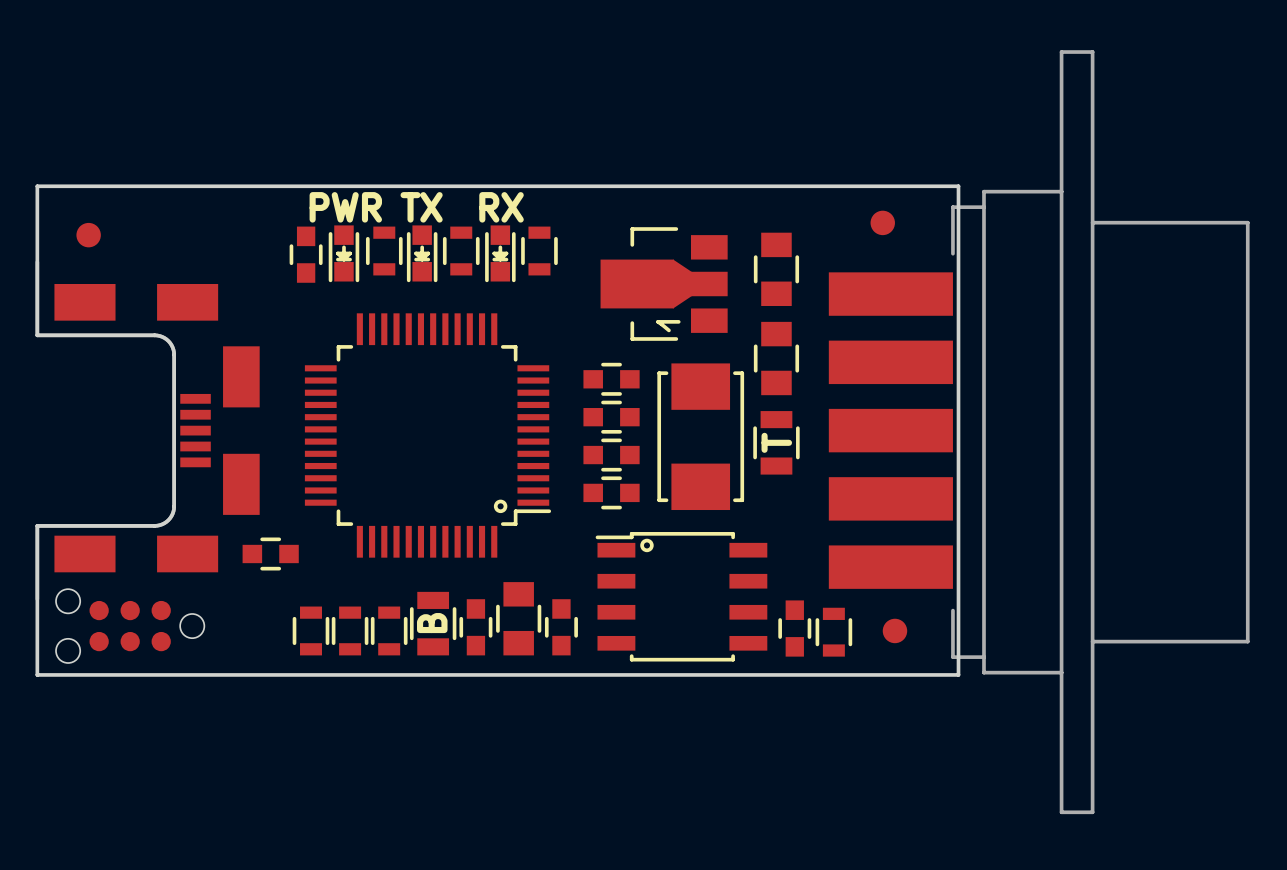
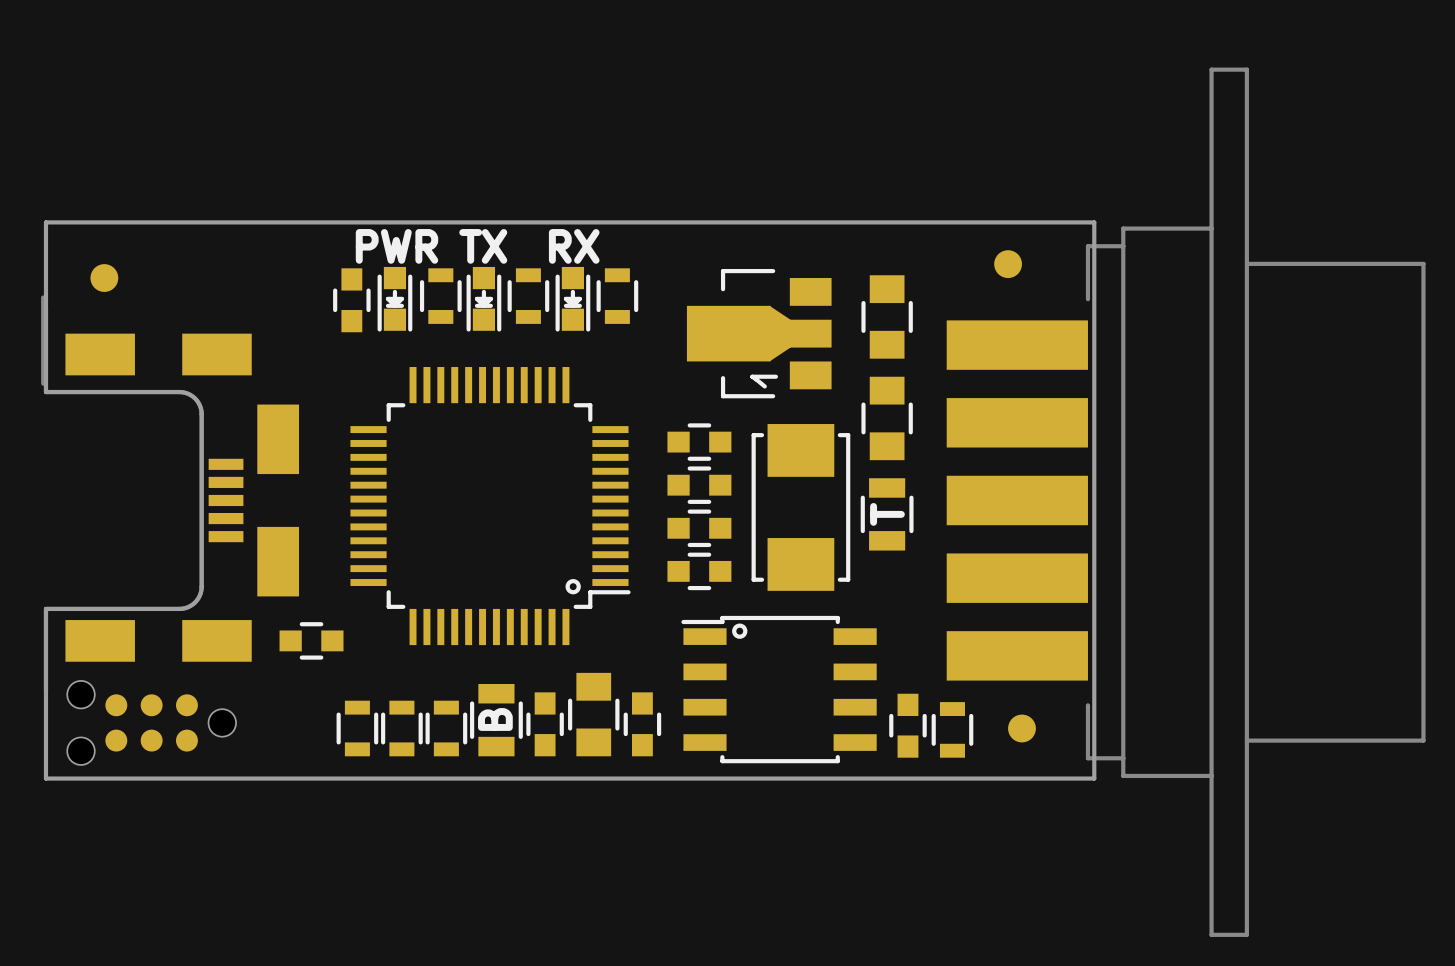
line: none -> (43, 297) (43, 383)

